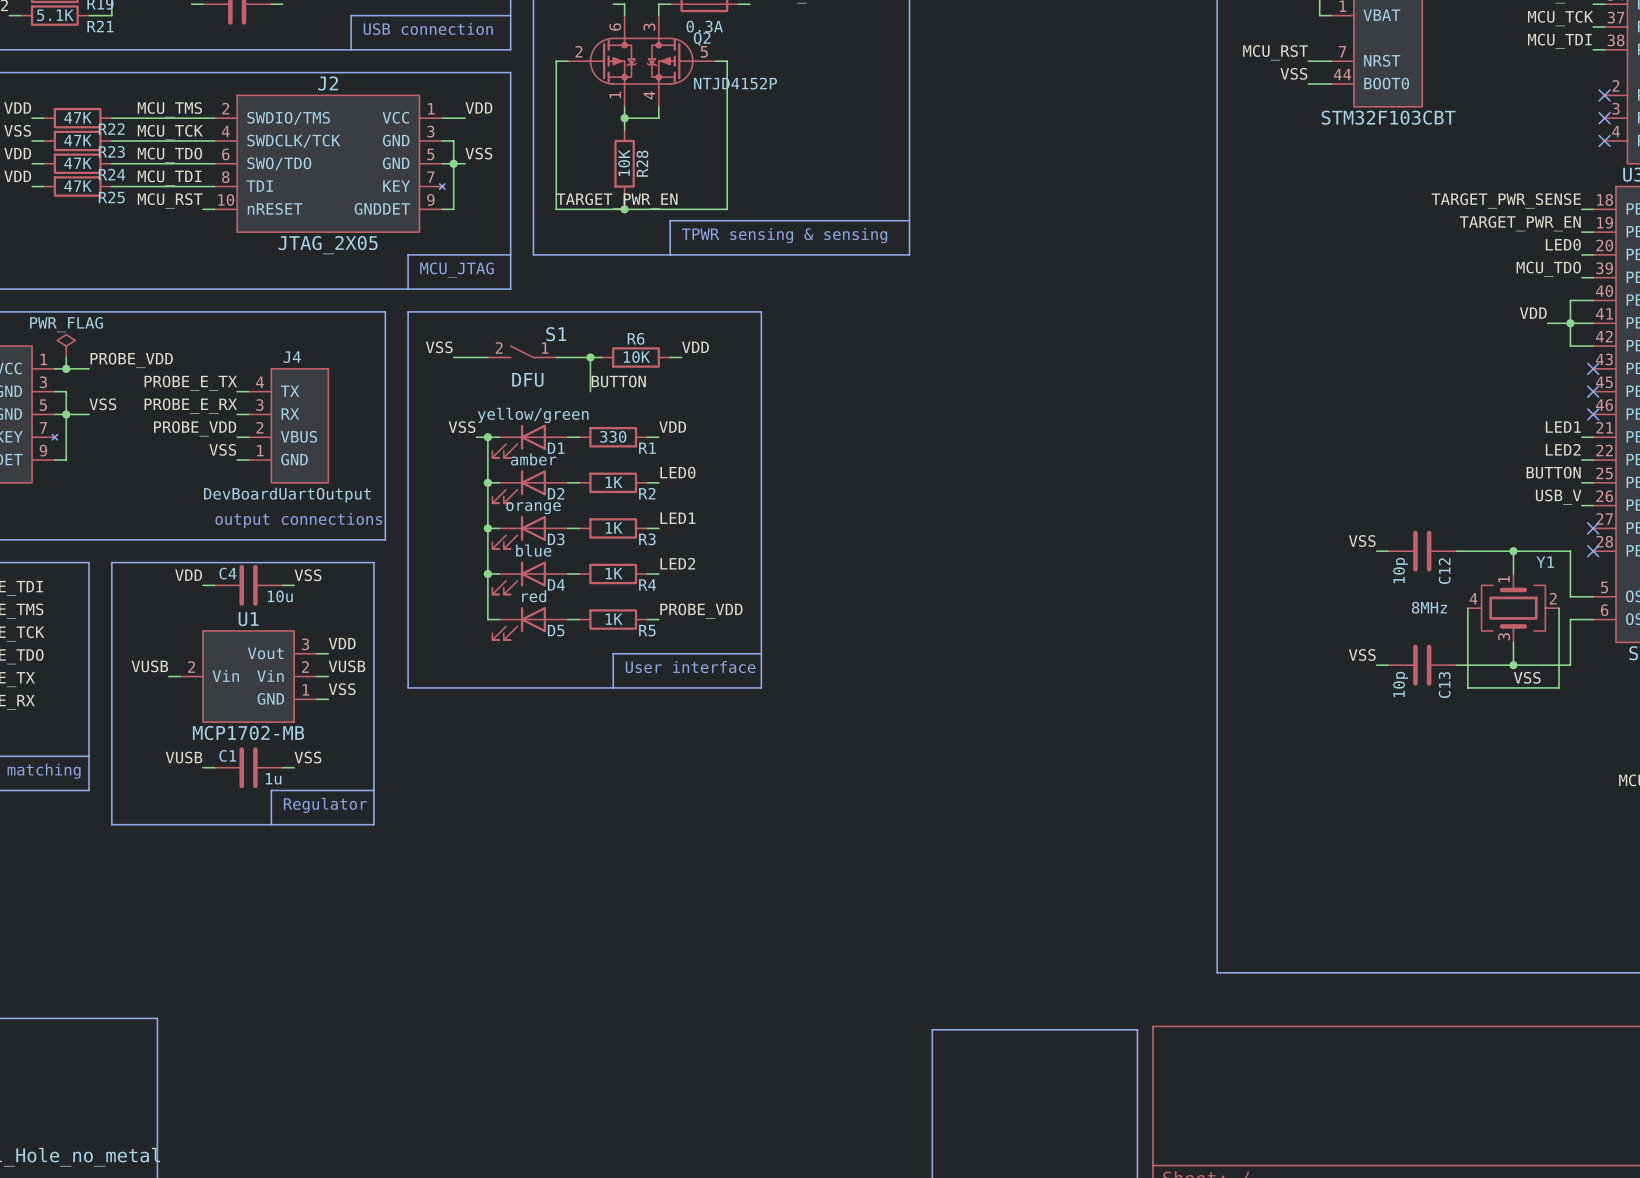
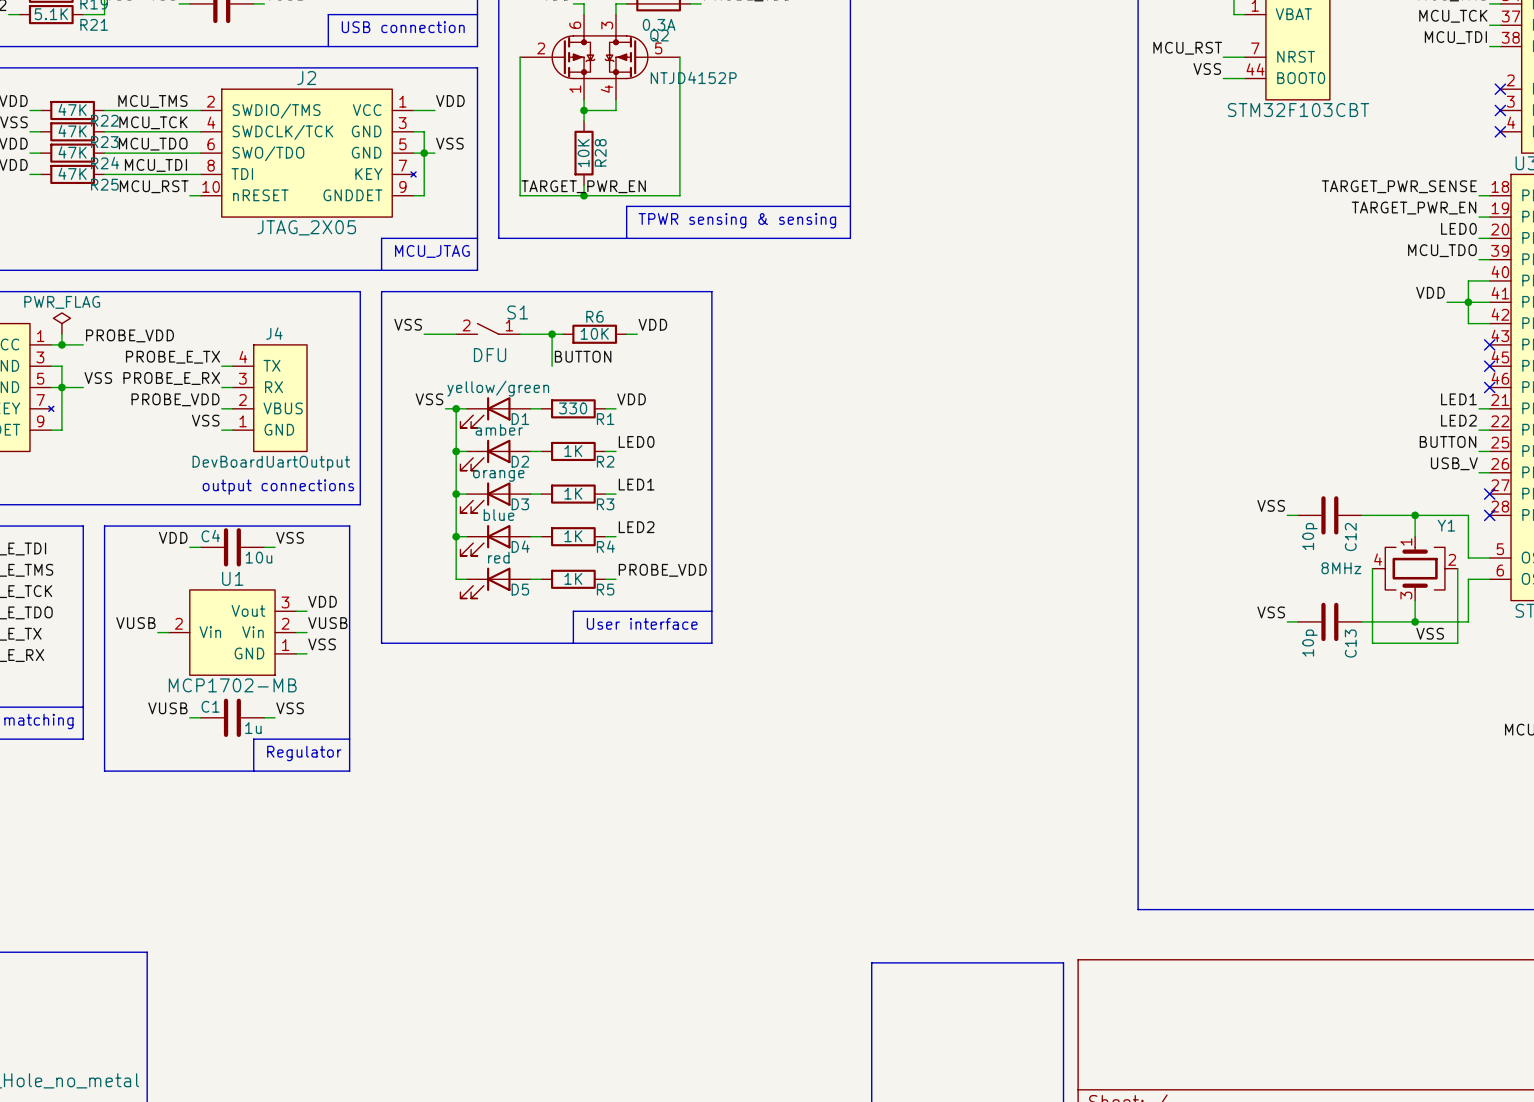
Q2 symbol: [567, 15, 716, 107] -> [520, 14, 680, 100]

